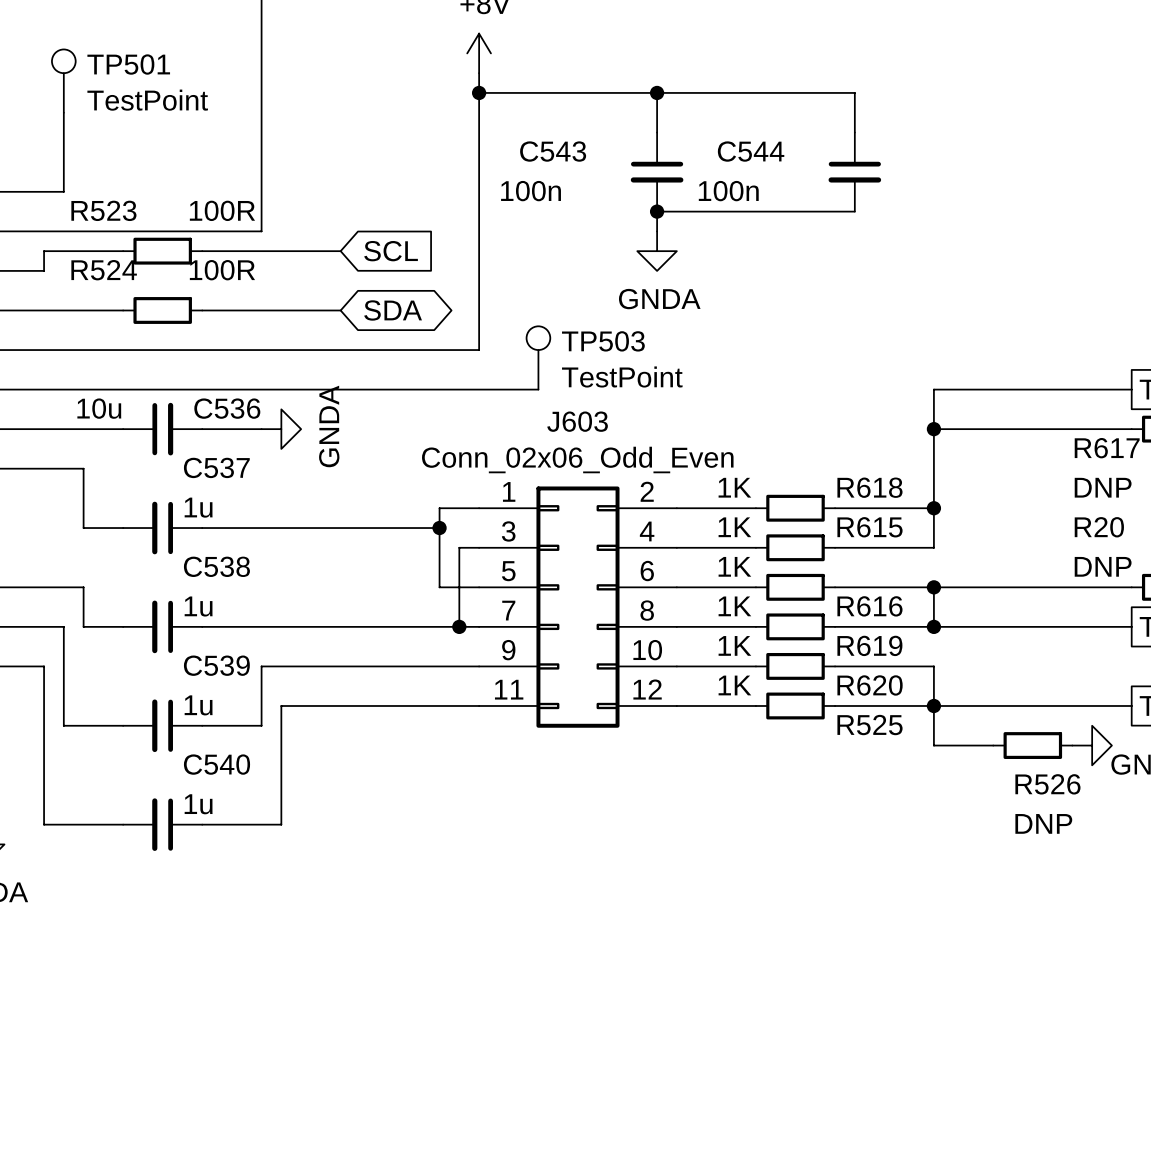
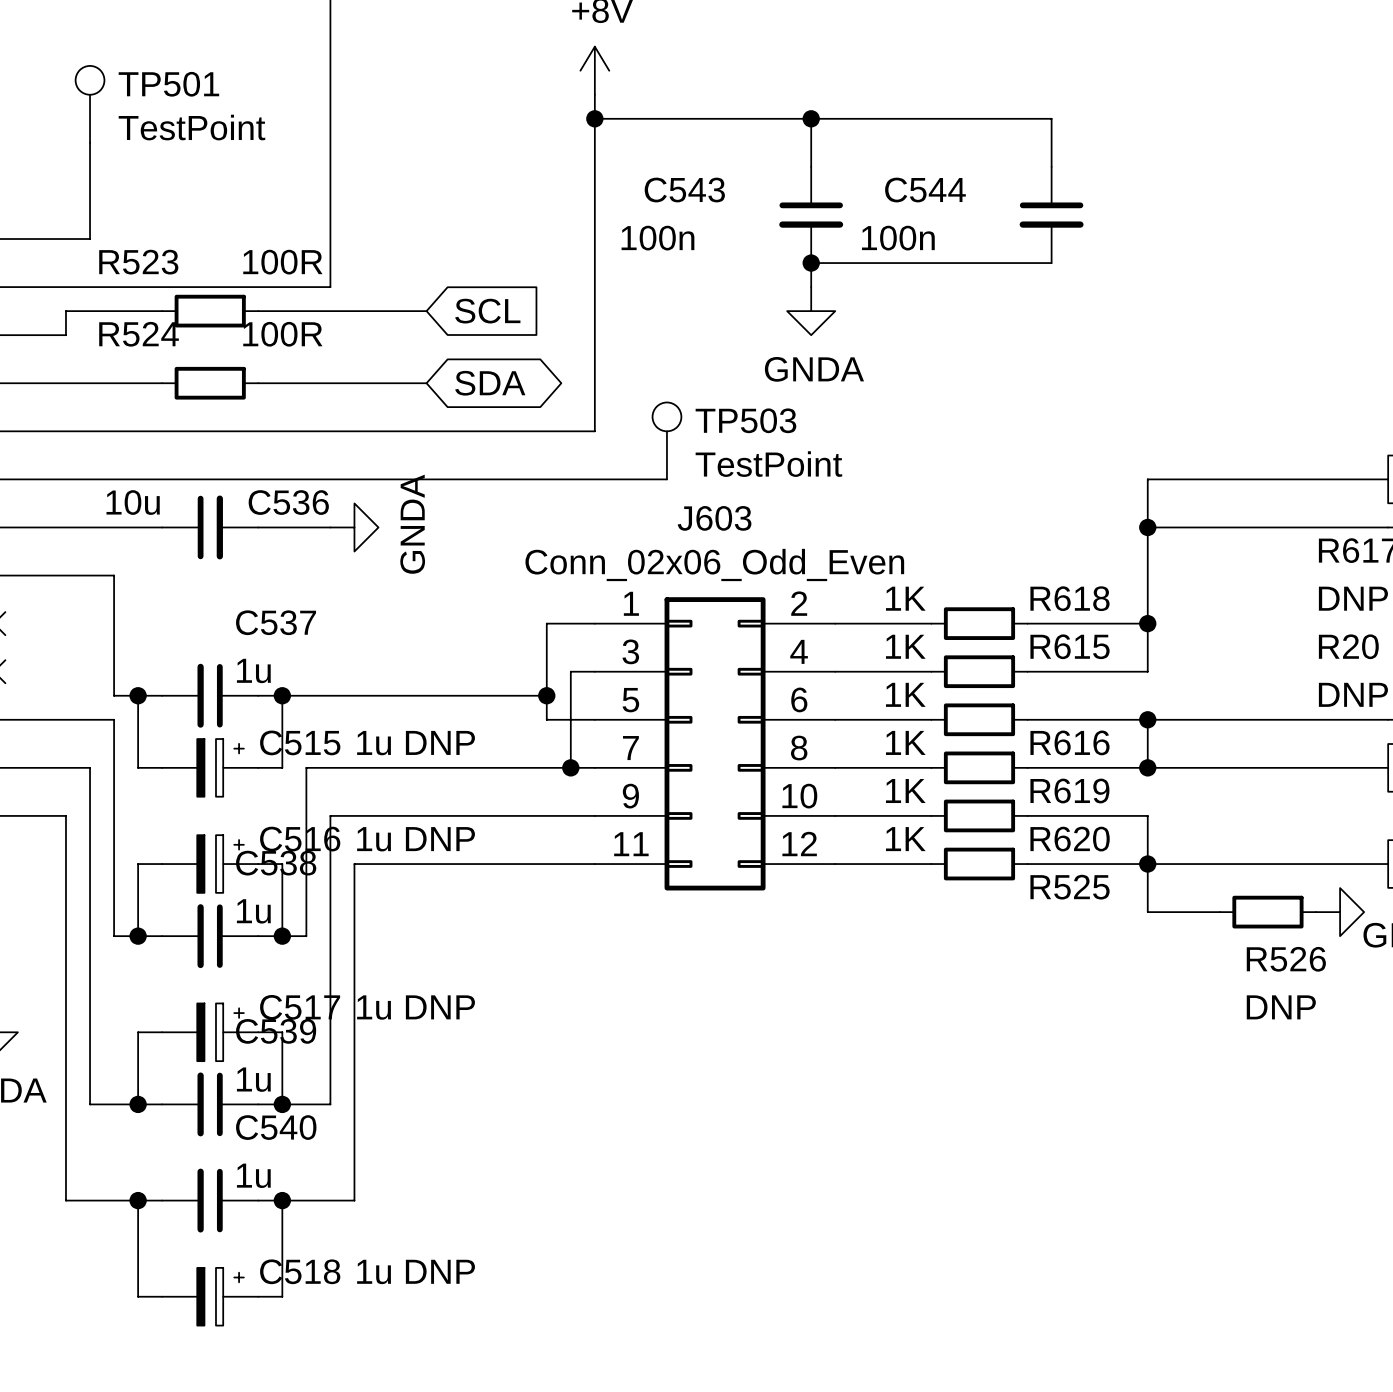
wire: (83, 528) (123, 528) -> (114, 647) (114, 695) (162, 695)
C537 position: (162, 528) -> (210, 695)
wire: (202, 528) (439, 528) -> (258, 695) (546, 695)
junction position: (439, 528) -> (546, 695)
junction: none -> (138, 695)
junction: none -> (282, 695)
wire: (83, 626) (103, 626) -> (138, 695) (138, 767)
wire: none -> (114, 767) (114, 936) (162, 936)
C538 position: (162, 626) -> (210, 936)
C515: none -> 1u DNP (210, 767)
wire: (222, 626) (241, 626) -> (282, 767) (282, 695)
wire: none -> (306, 767) (306, 936) (258, 936)
wire: none -> (162, 864) (138, 864) (138, 936)
C516: none -> 1u DNP (210, 864)
wire: none -> (258, 864) (282, 864) (282, 936)
wire: (63, 725) (123, 725) -> (90, 888) (90, 1104) (162, 1104)
C539 position: (162, 725) -> (210, 1104)
wire: (202, 725) (261, 725) -> (258, 1104) (330, 1104) (330, 888)
junction: none -> (138, 936)
junction: none -> (282, 936)
wire: (44, 824) (123, 824) -> (65, 1008) (65, 1200) (162, 1200)
C540 position: (162, 824) -> (210, 1200)
wire: (202, 824) (281, 824) -> (258, 1200) (354, 1200) (354, 1008)
wire: none -> (162, 1032) (138, 1032) (138, 1104)
C517: none -> 1u DNP (210, 1032)
wire: none -> (258, 1032) (282, 1032) (282, 1104)
junction: none -> (138, 1104)
junction: none -> (282, 1104)
wire: none -> (138, 1200) (138, 1296) (162, 1296)
junction: none -> (138, 1200)
wire: none -> (282, 1200) (282, 1296) (258, 1296)
junction: none -> (282, 1200)
C518: none -> 1u DNP (210, 1296)

